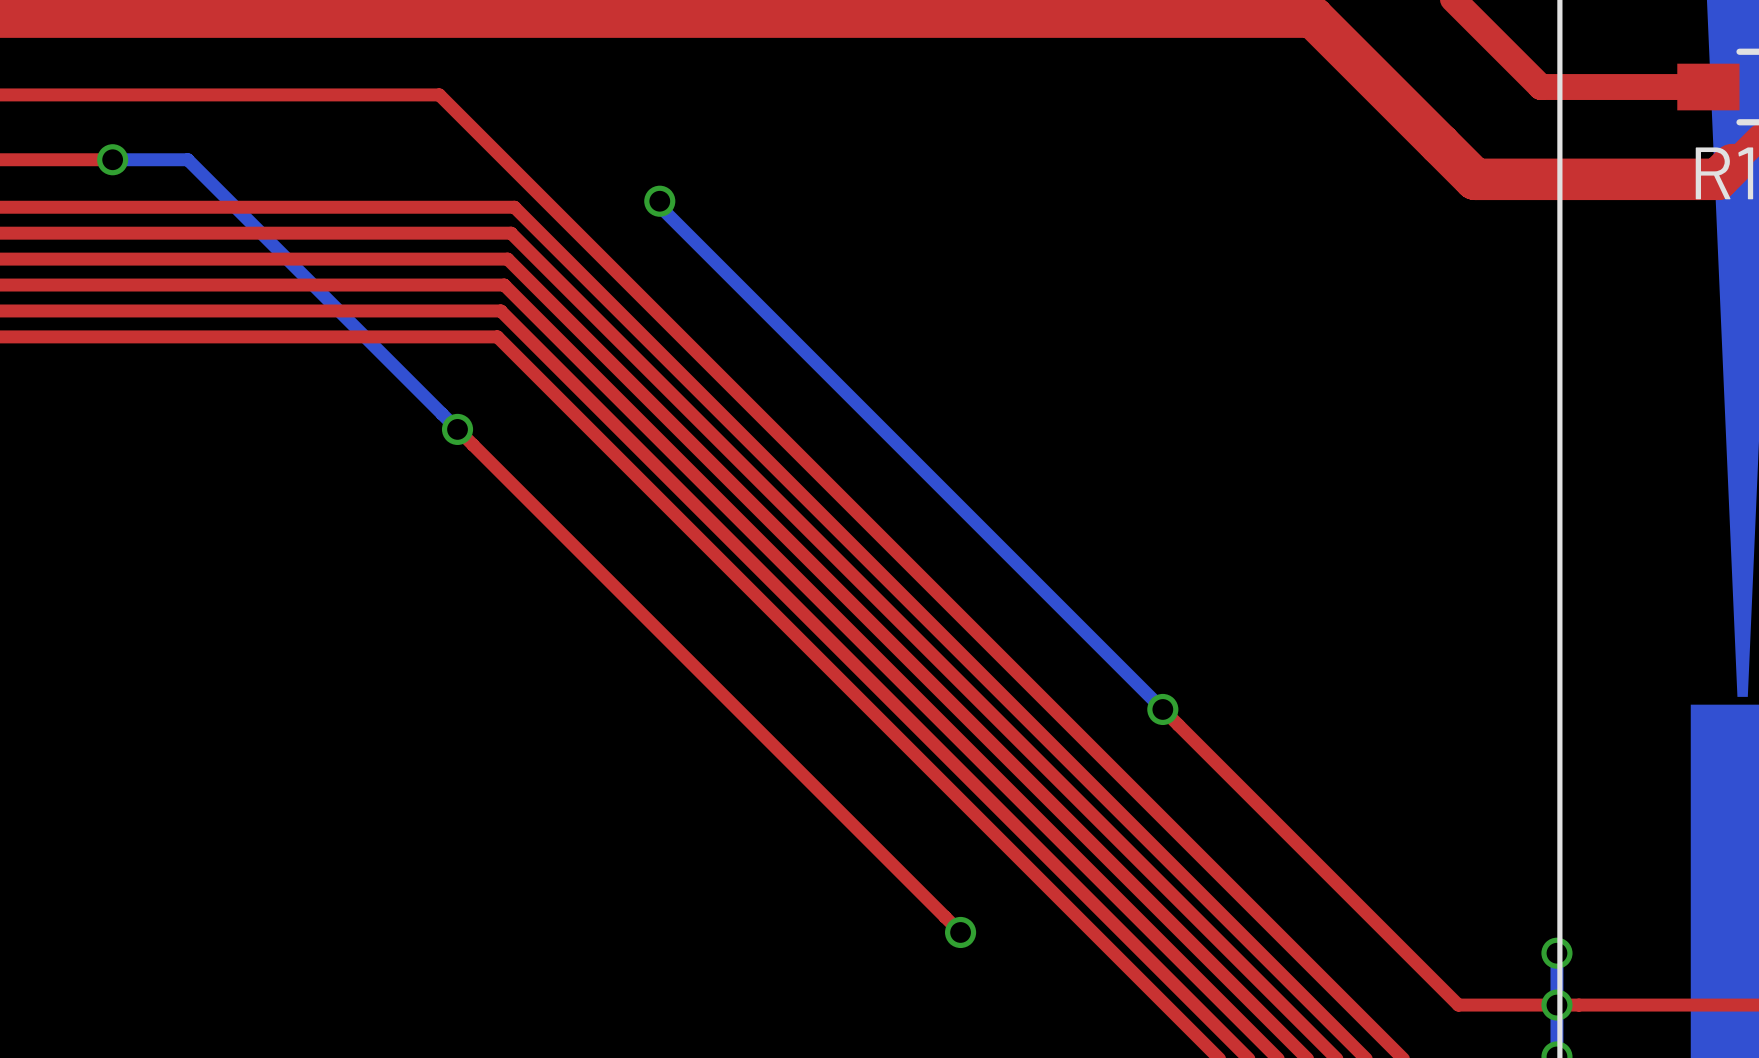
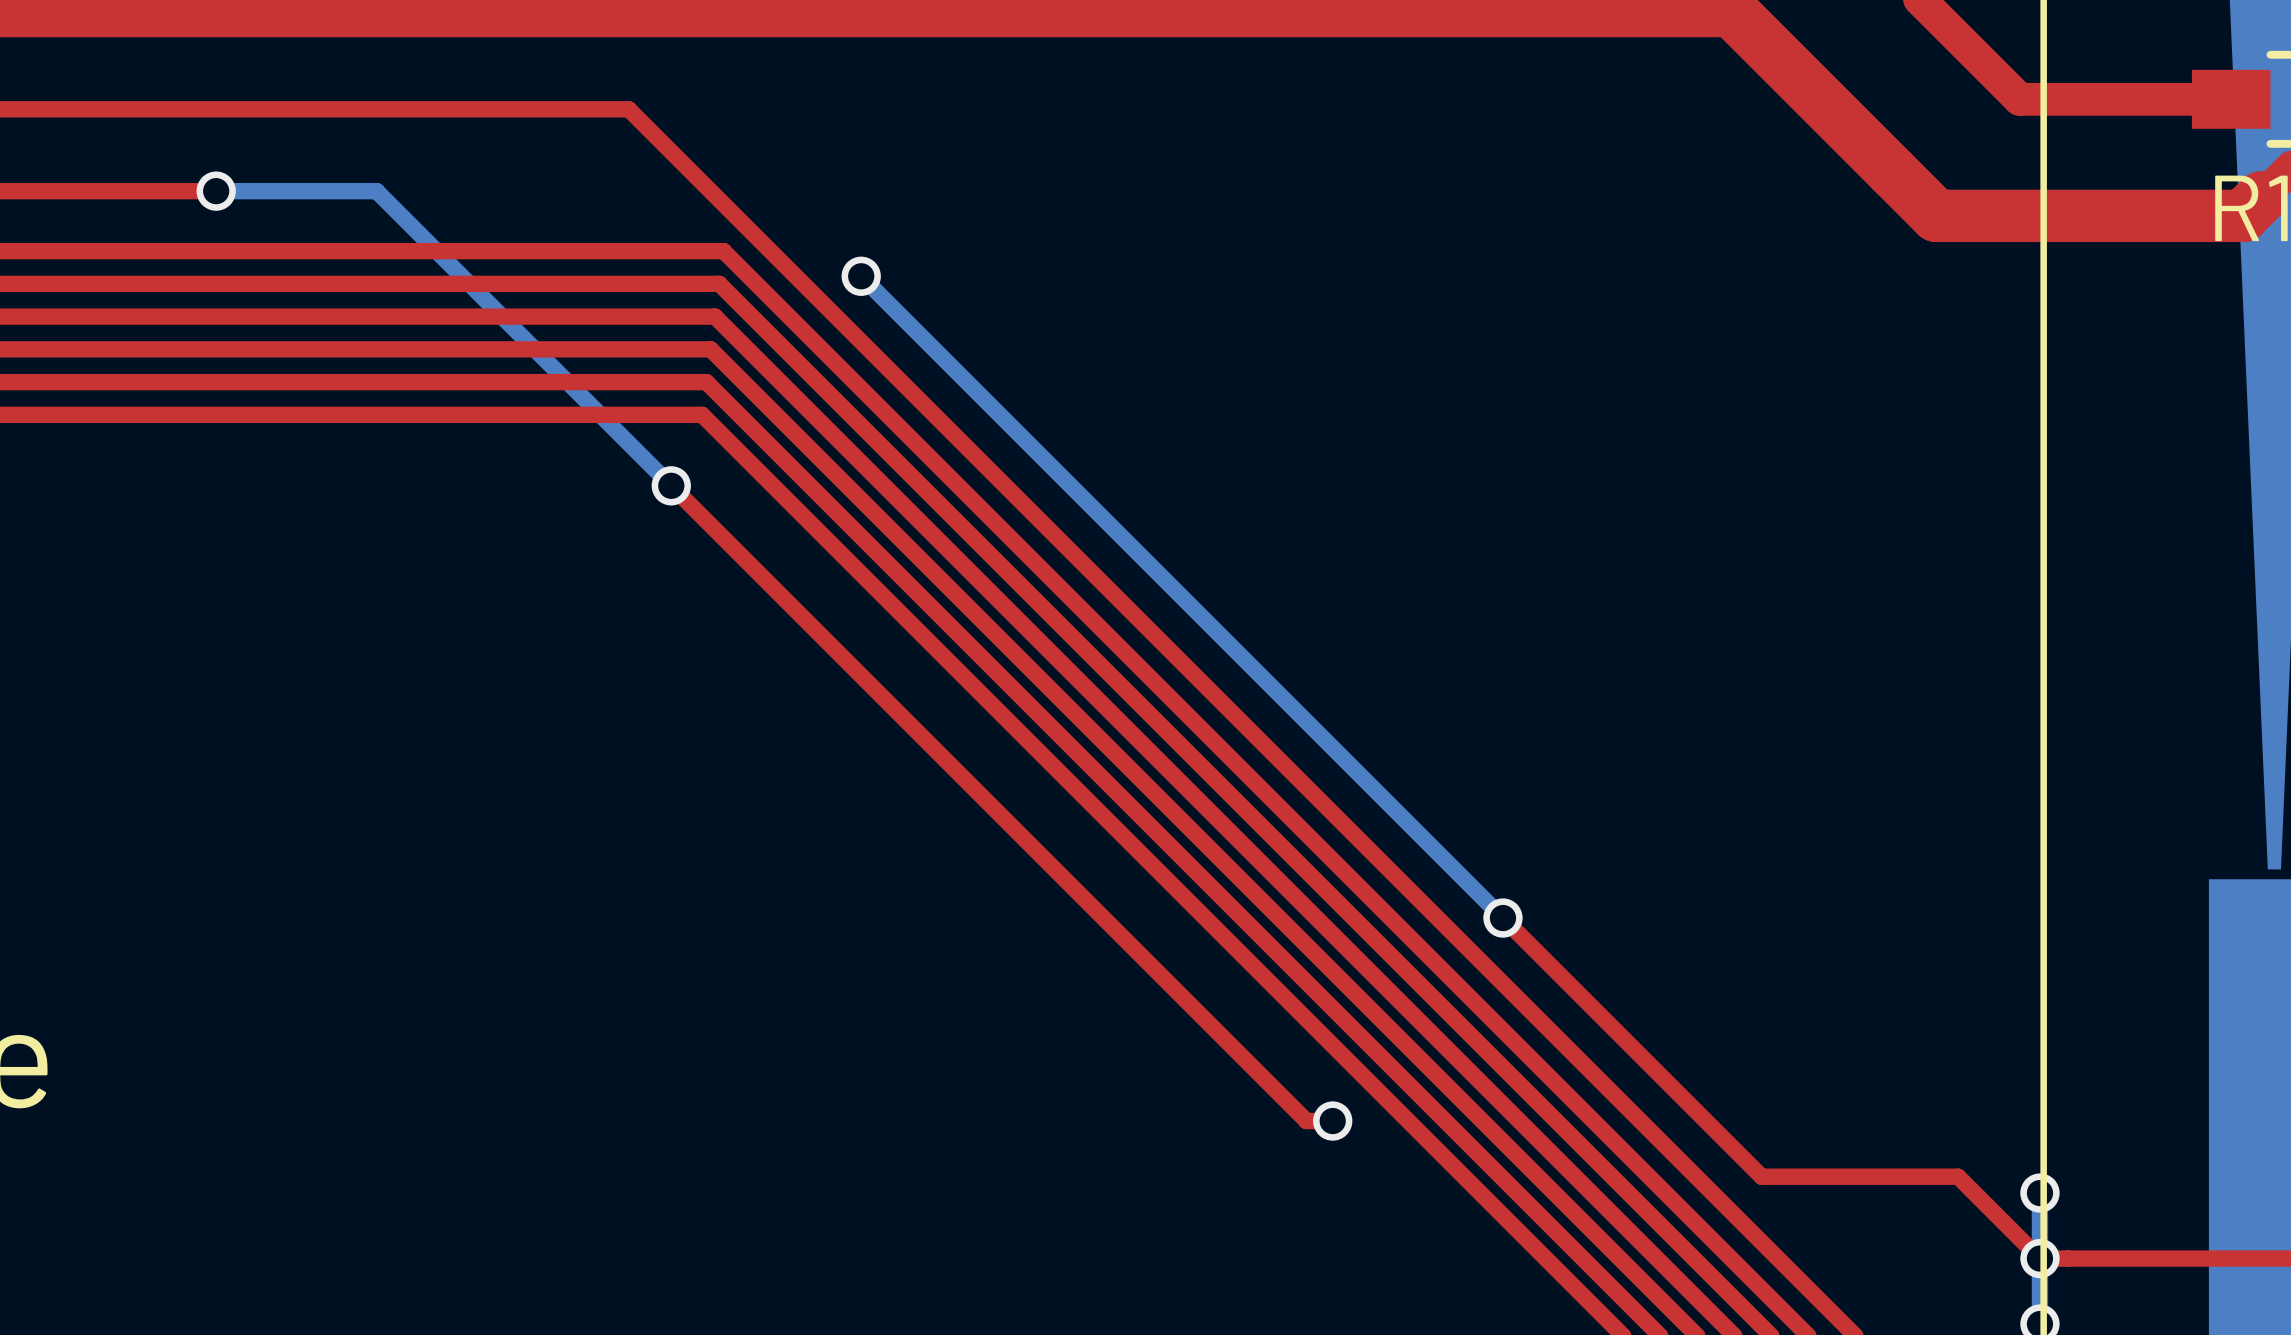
bottom track: (187, 159) (457, 429) -> (311, 191) (376, 191) (671, 485)
bottom track: (659, 201) (659, 206) (1162, 709) -> none
via position: (659, 201) -> (861, 276)
bottom track: none -> (861, 276) (1502, 918)
top track: none -> (671, 485) (1306, 1121) (1332, 1121)
top track: (457, 429) (960, 932) -> none
via position: (457, 429) -> (671, 485)
top track: (1162, 709) (1458, 1005) (1556, 1005) -> (1502, 918) (1761, 1176) (1958, 1176) (2039, 1258)
via position: (1162, 709) -> (1502, 918)
via position: (960, 932) -> (1332, 1121)

